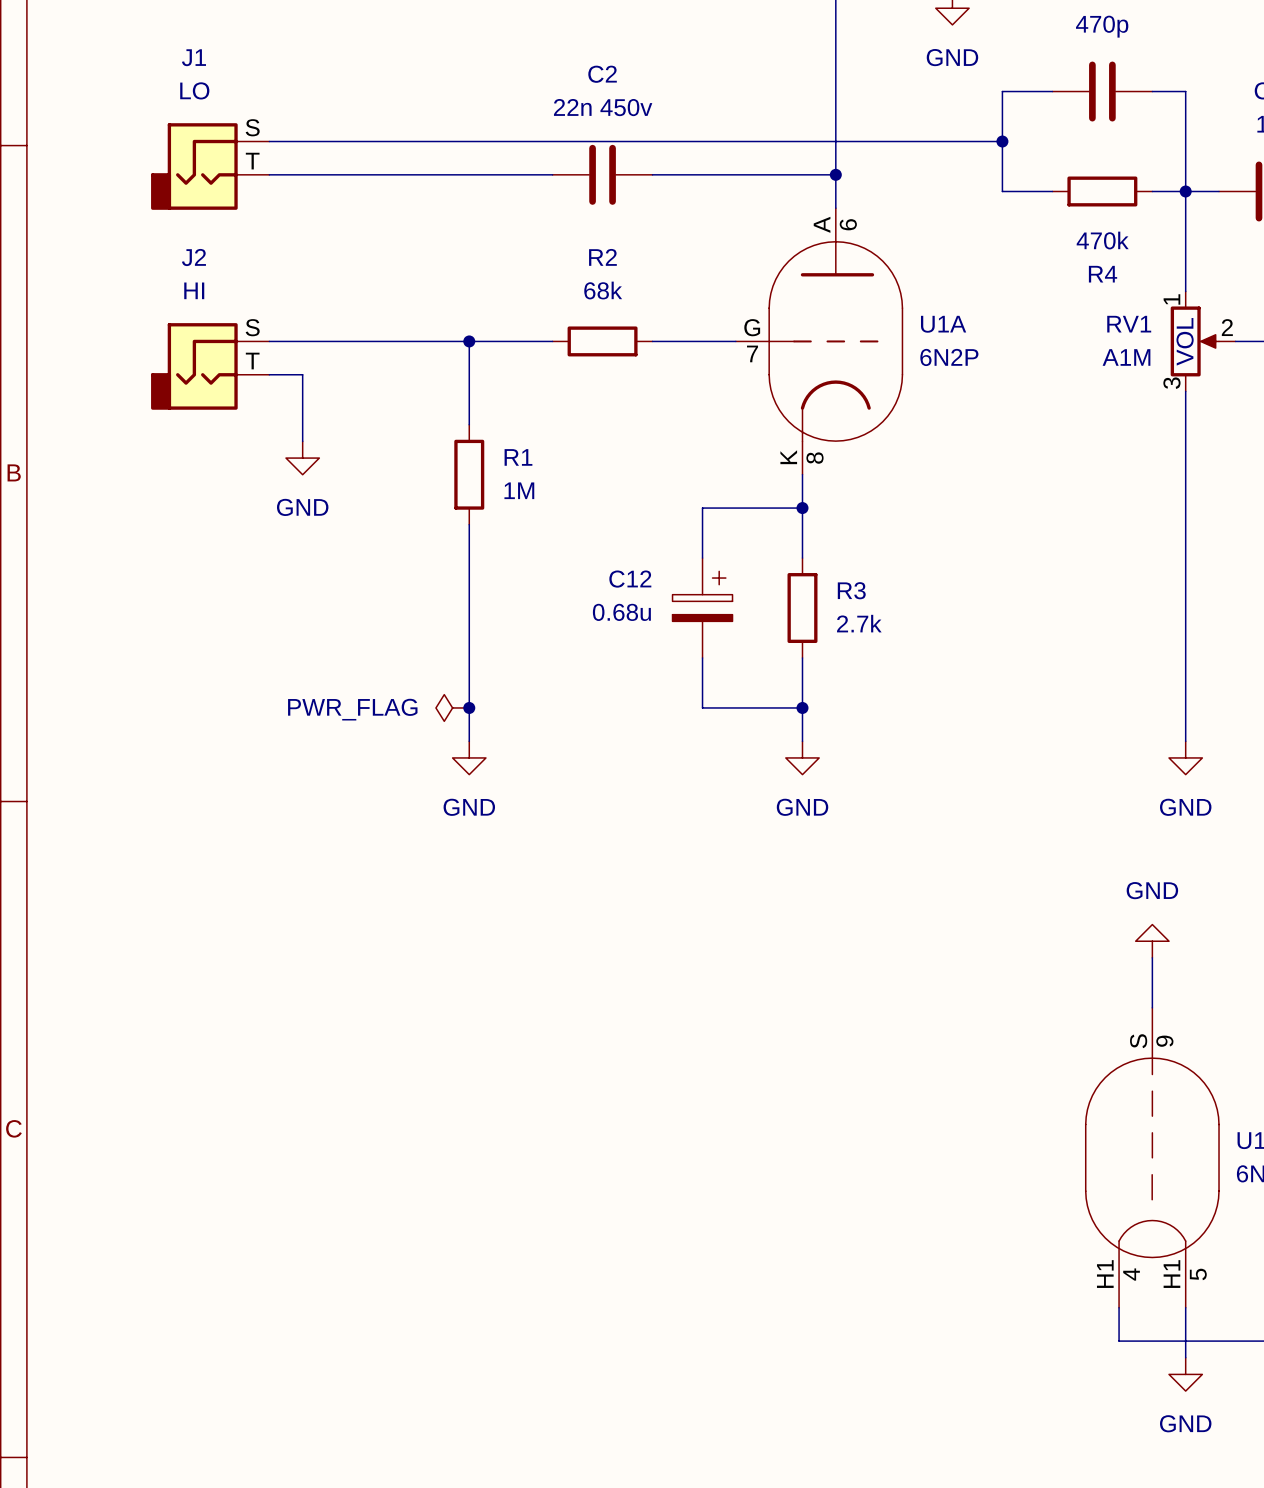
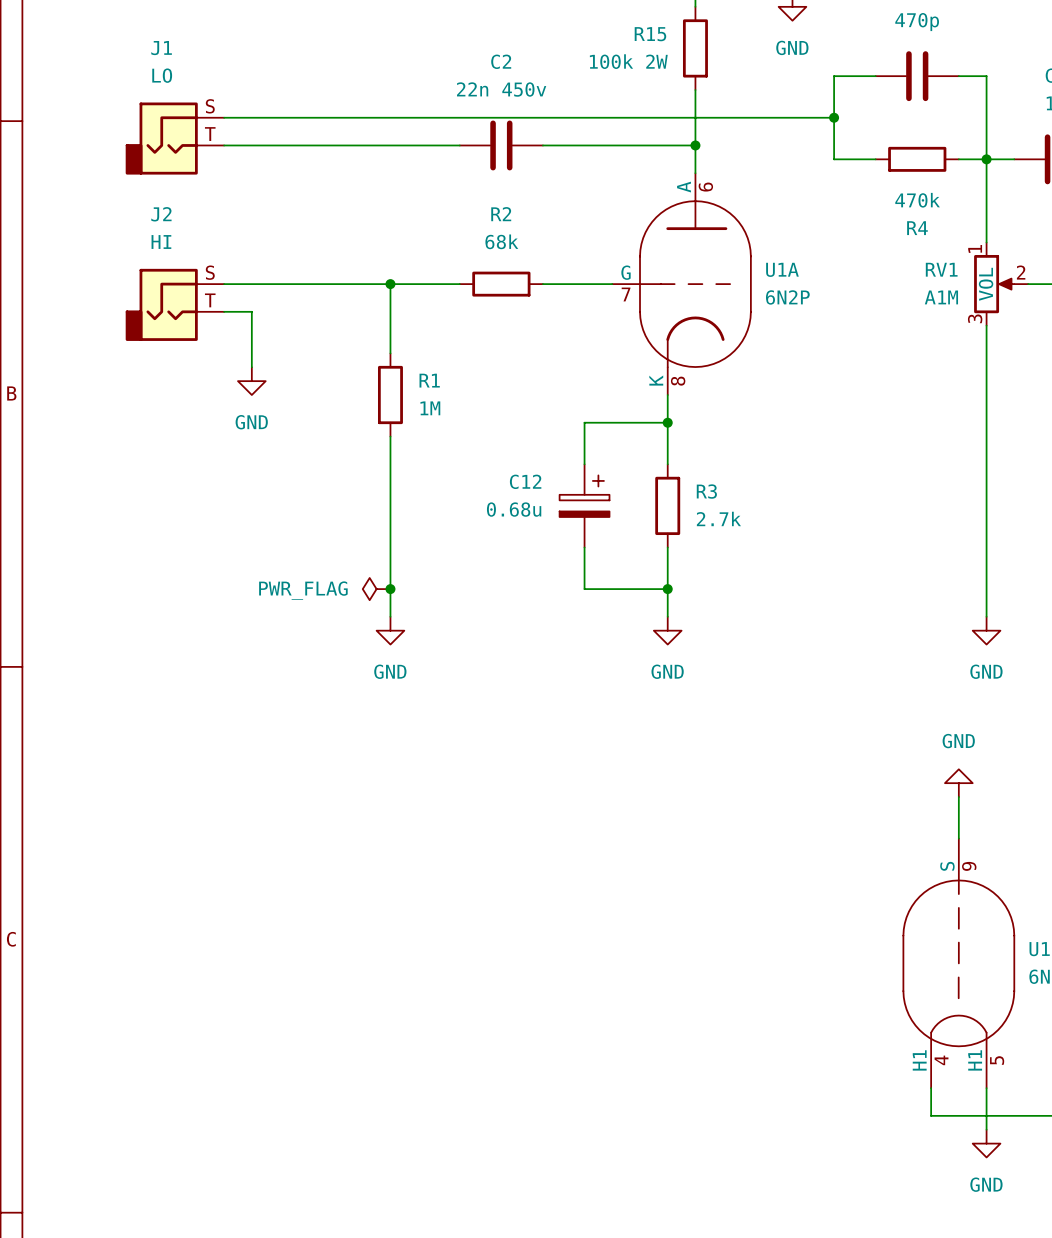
wire: (835, 8) (835, 108) -> none
R15: none -> 100k 2W (695, 48)

